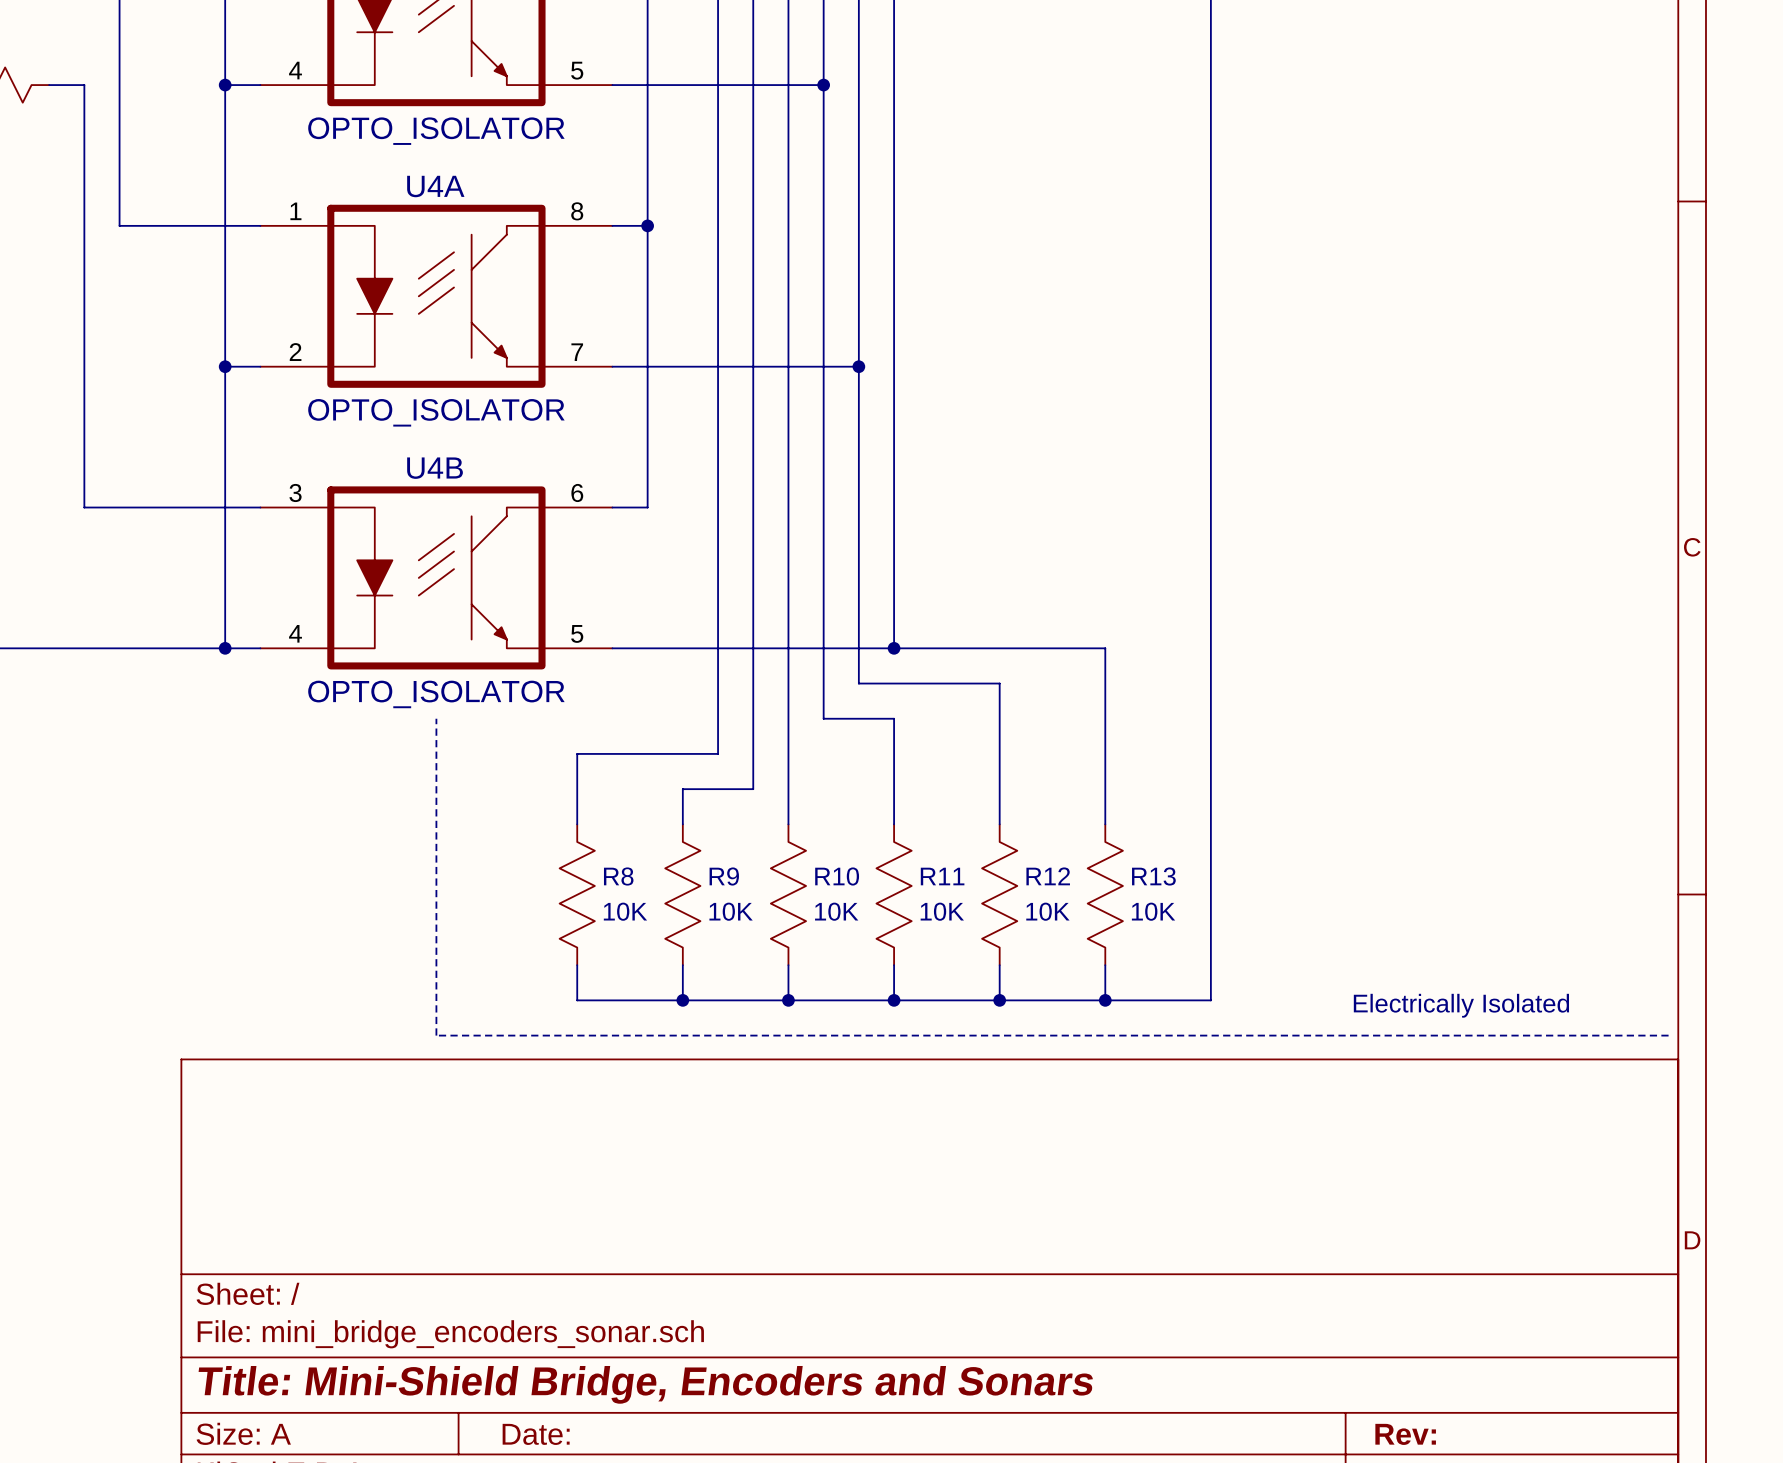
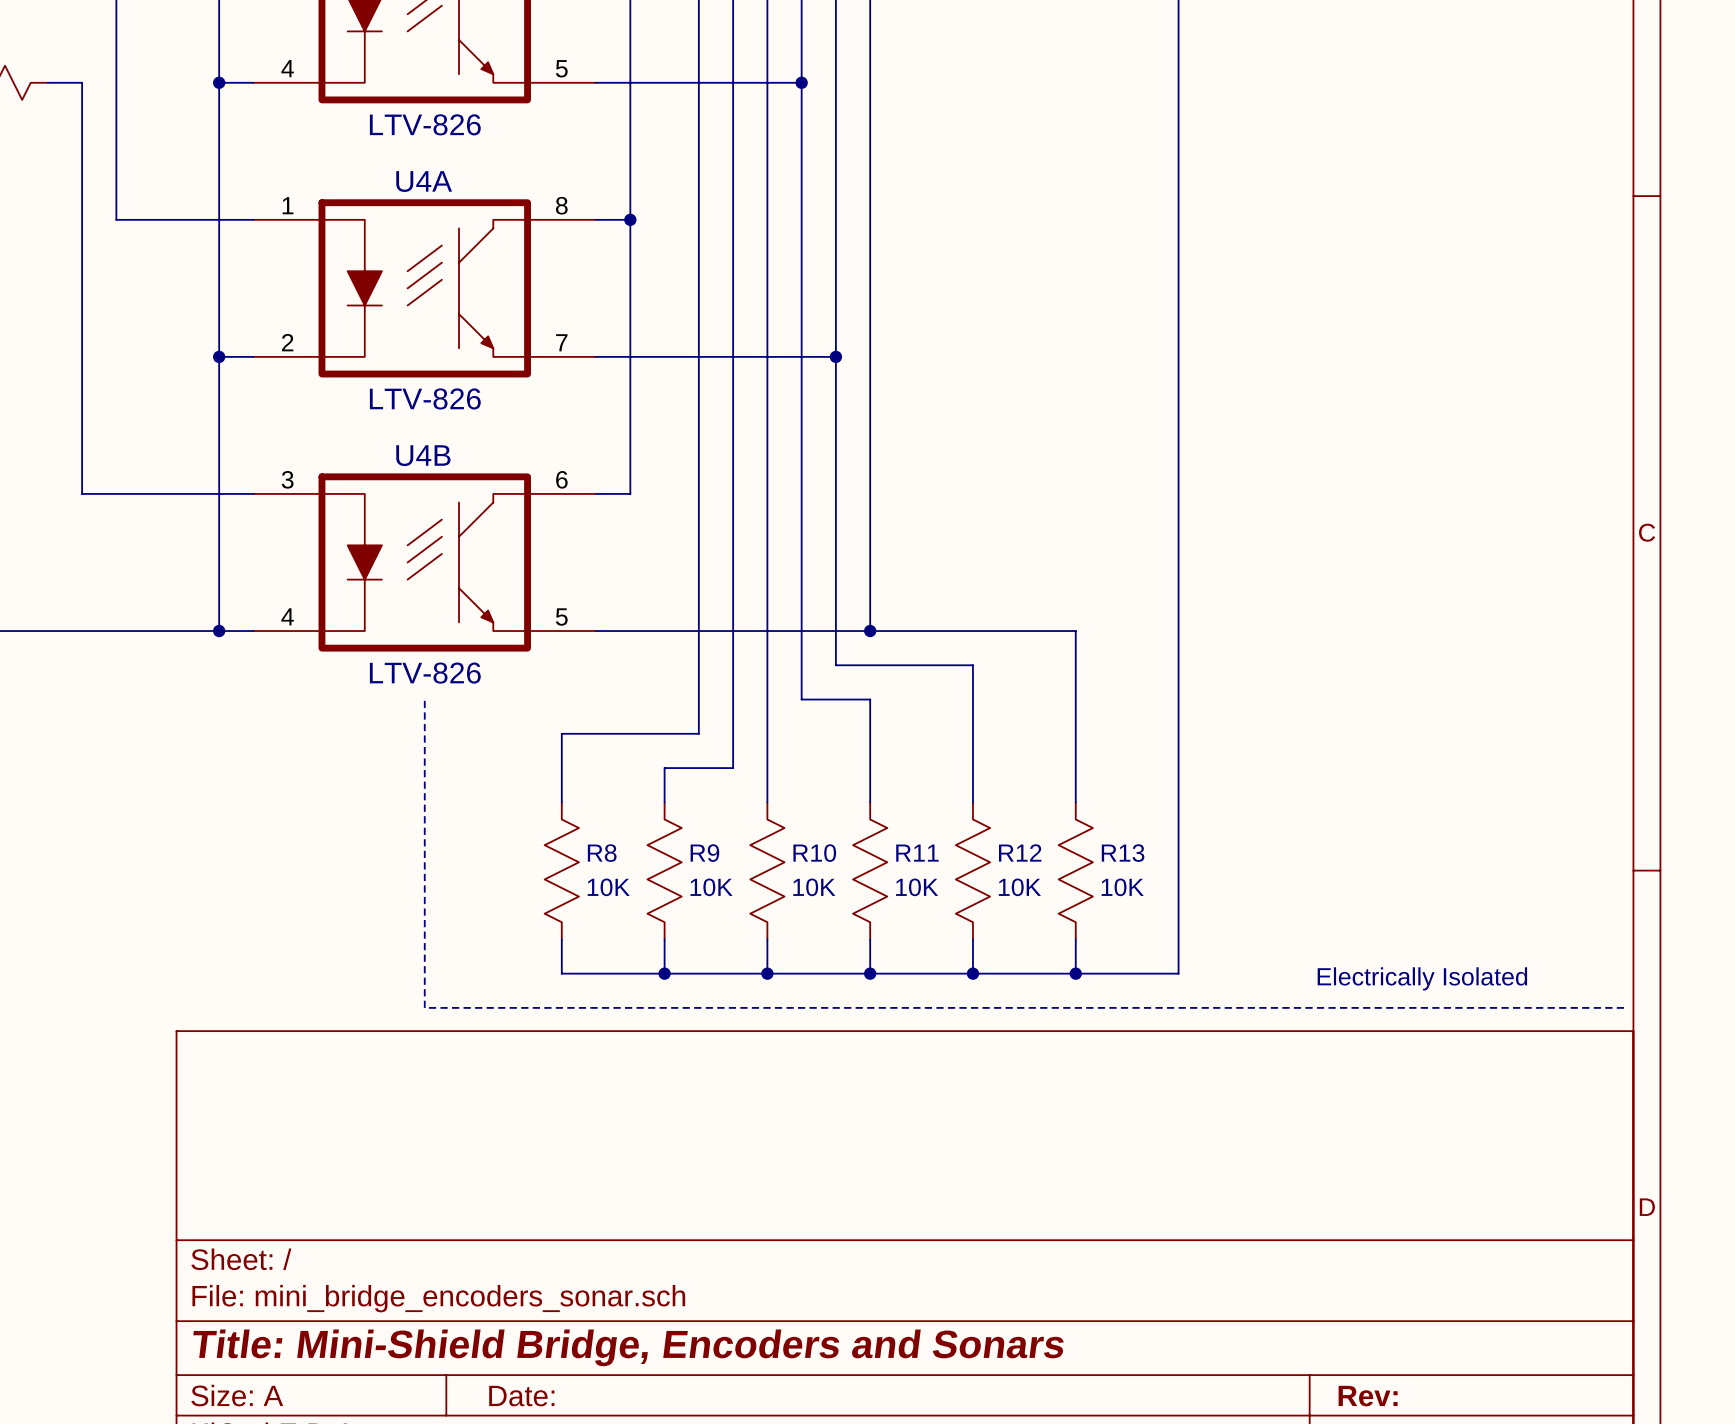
part value: OPTO_ISOLATOR (436, 131) -> LTV-826 (425, 124)
U4A value: OPTO_ISOLATOR (436, 412) -> LTV-826 (425, 398)
U4B value: OPTO_ISOLATOR (436, 694) -> LTV-826 (425, 673)

